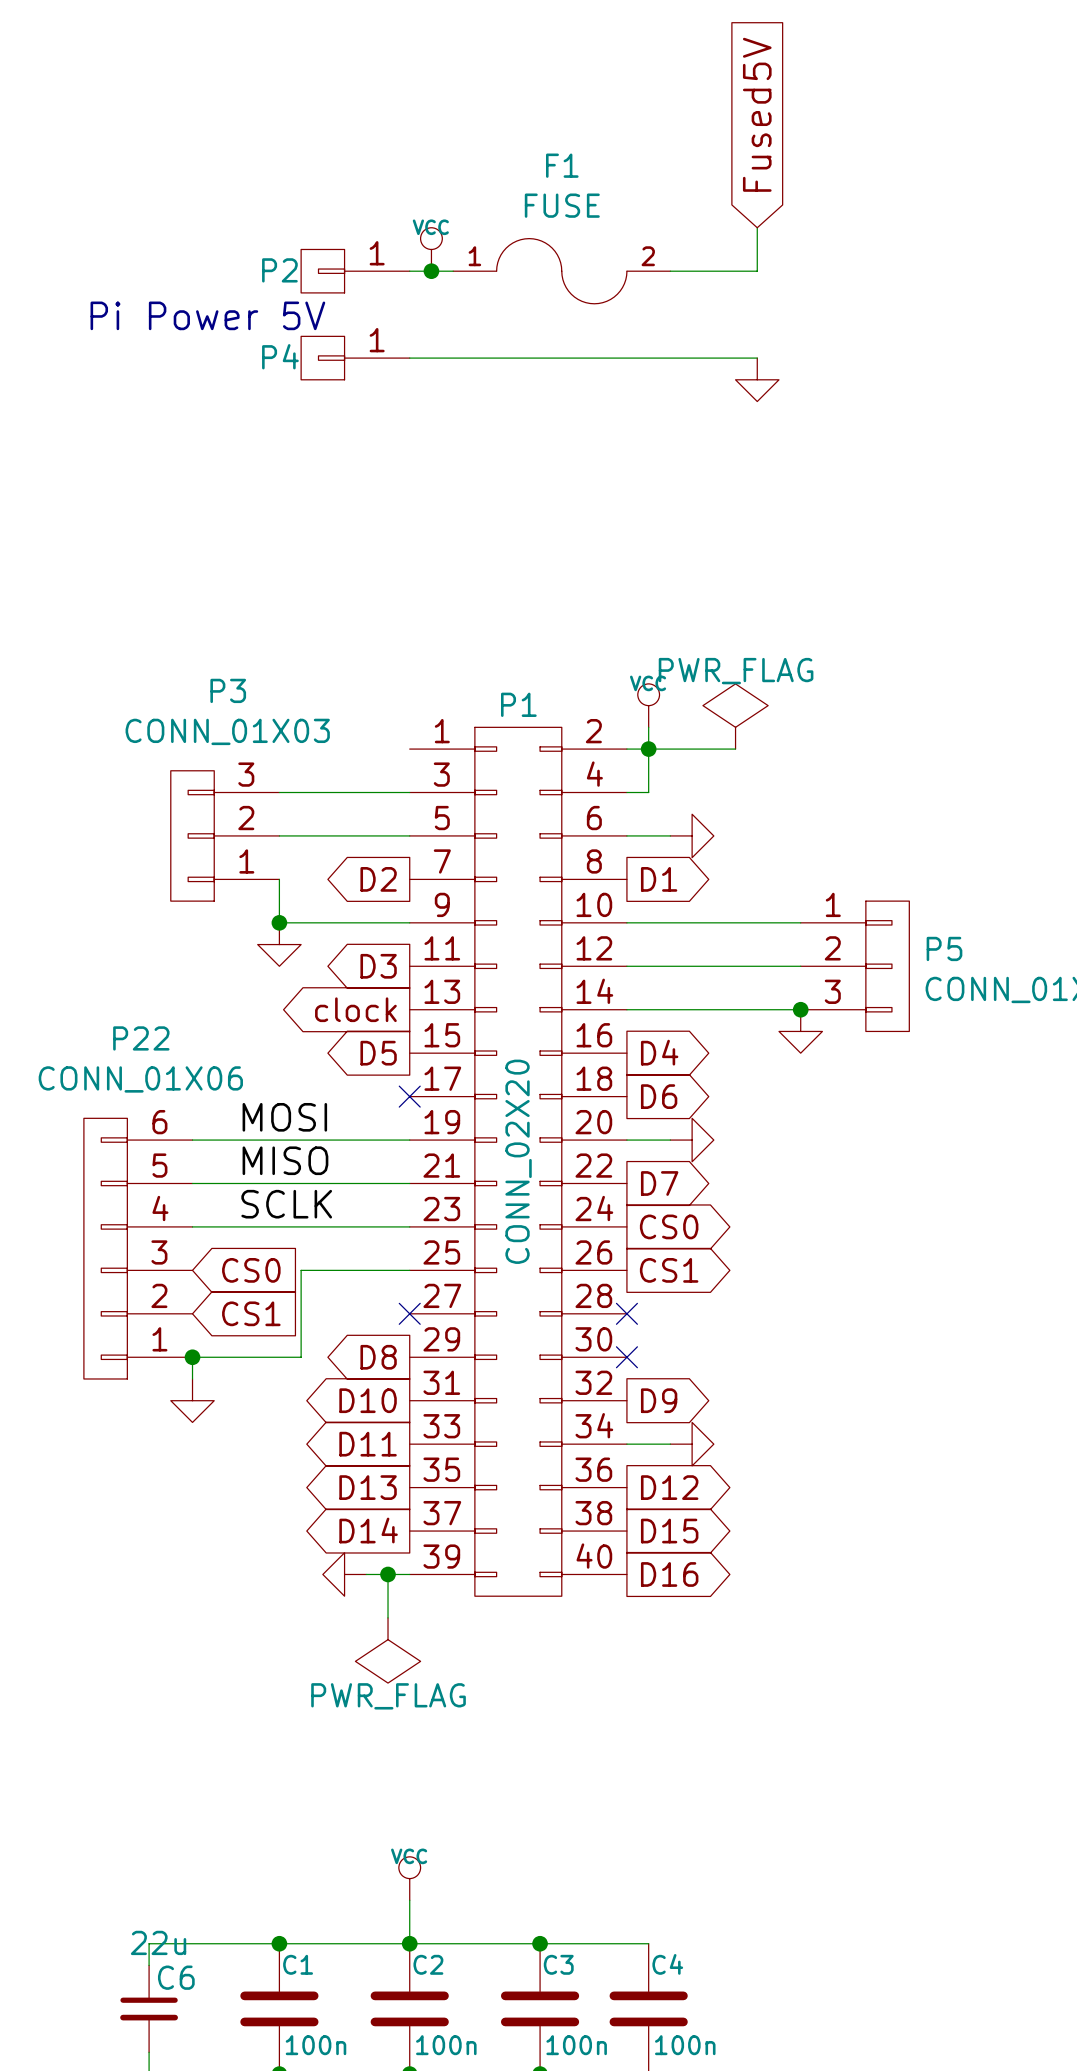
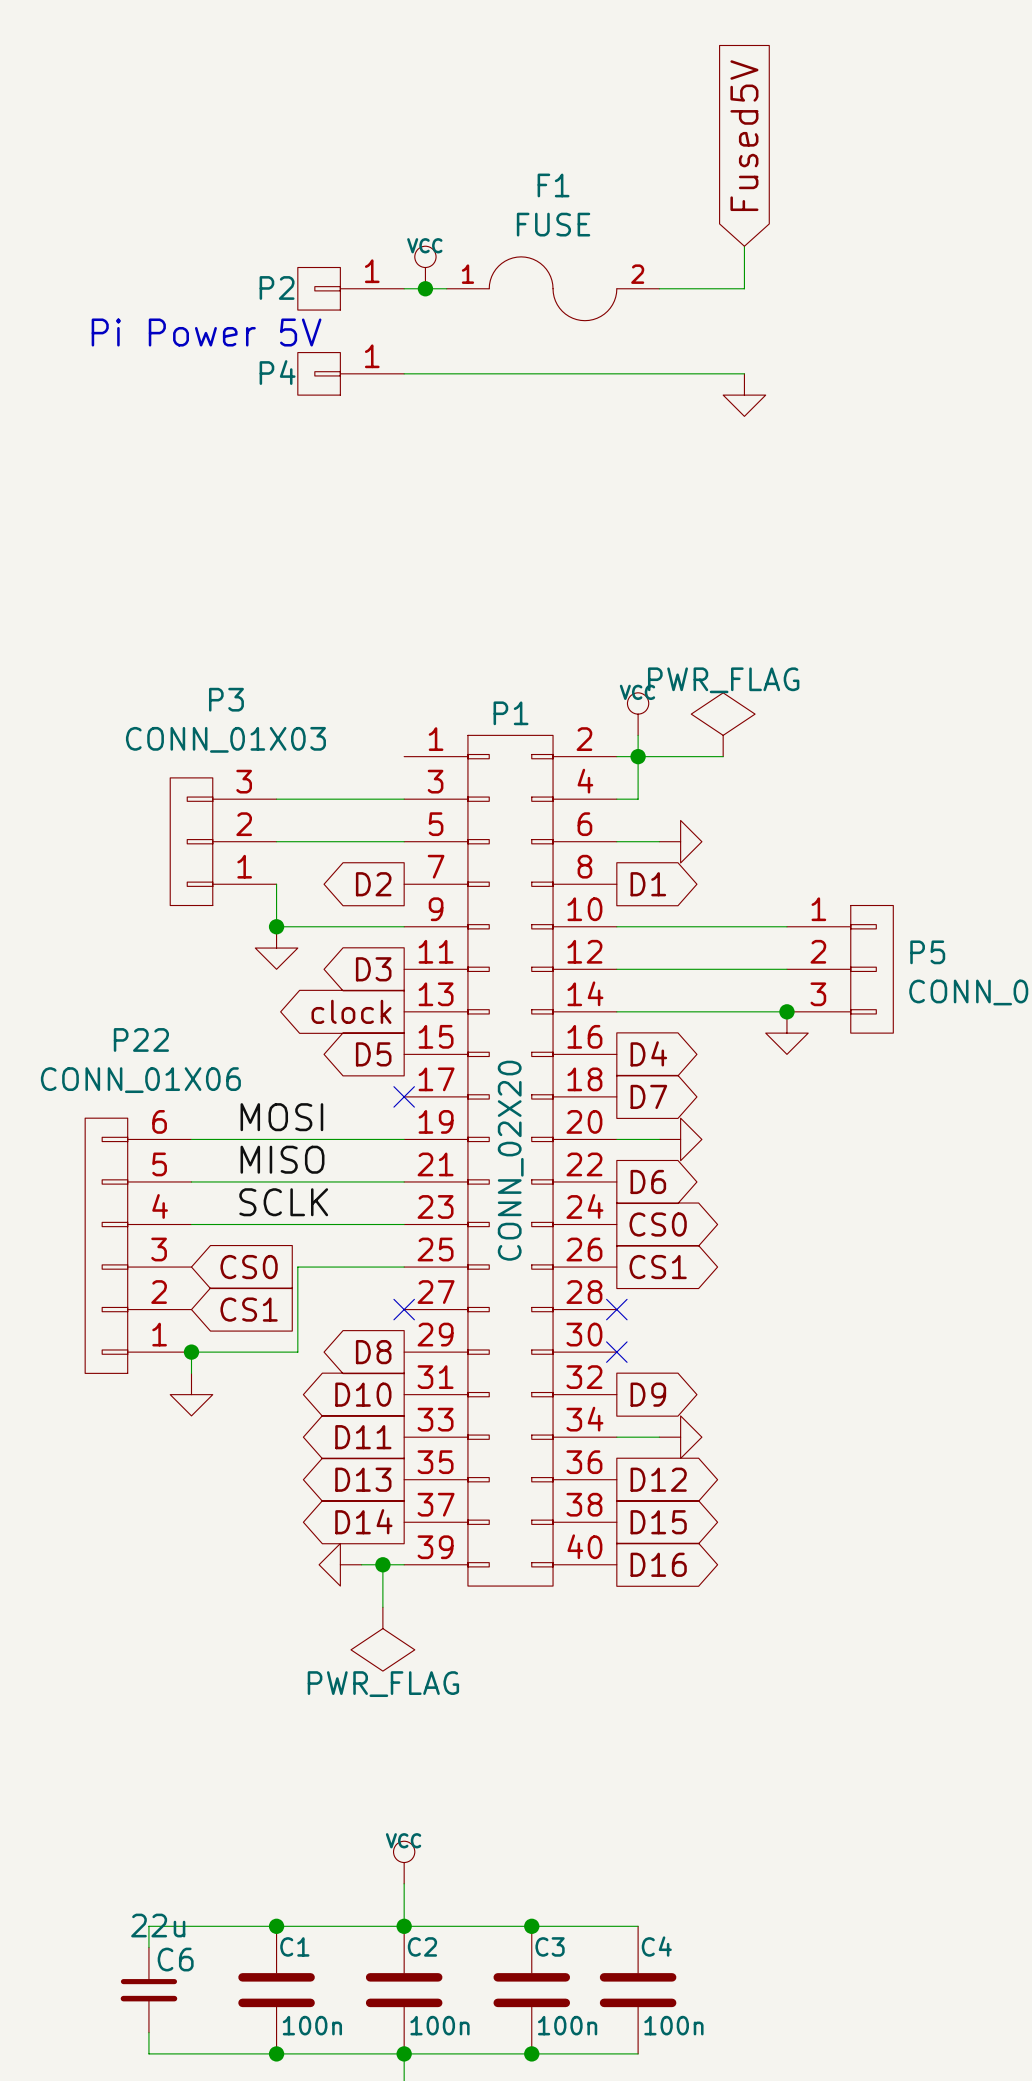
global label: D6 (659, 1096) -> D7 (648, 1096)
global label: D7 (659, 1183) -> D6 (648, 1181)

